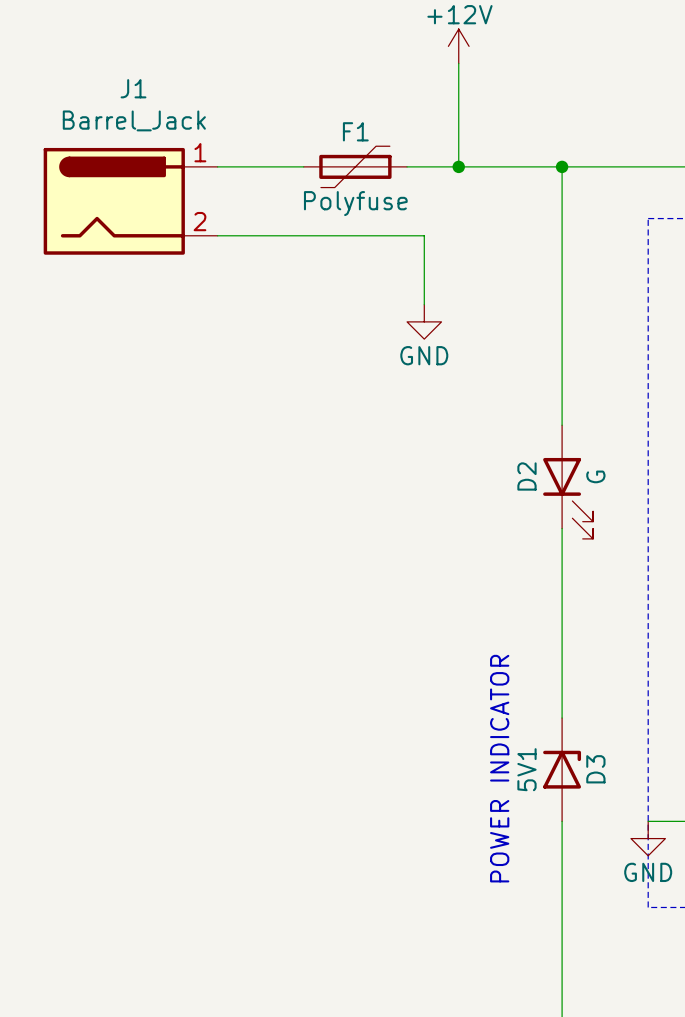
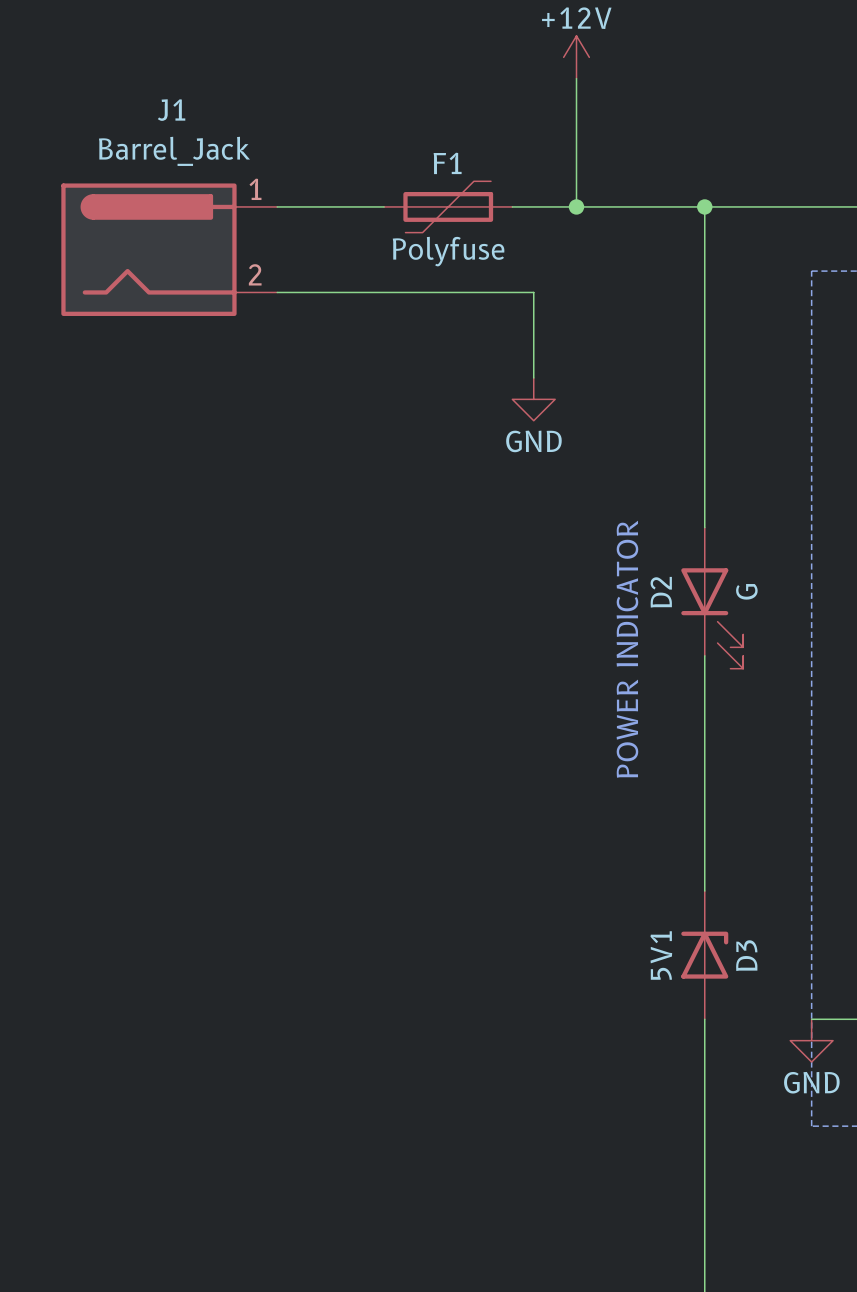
text position: POWER INDICATOR (499, 768) -> POWER INDICATOR (627, 649)

